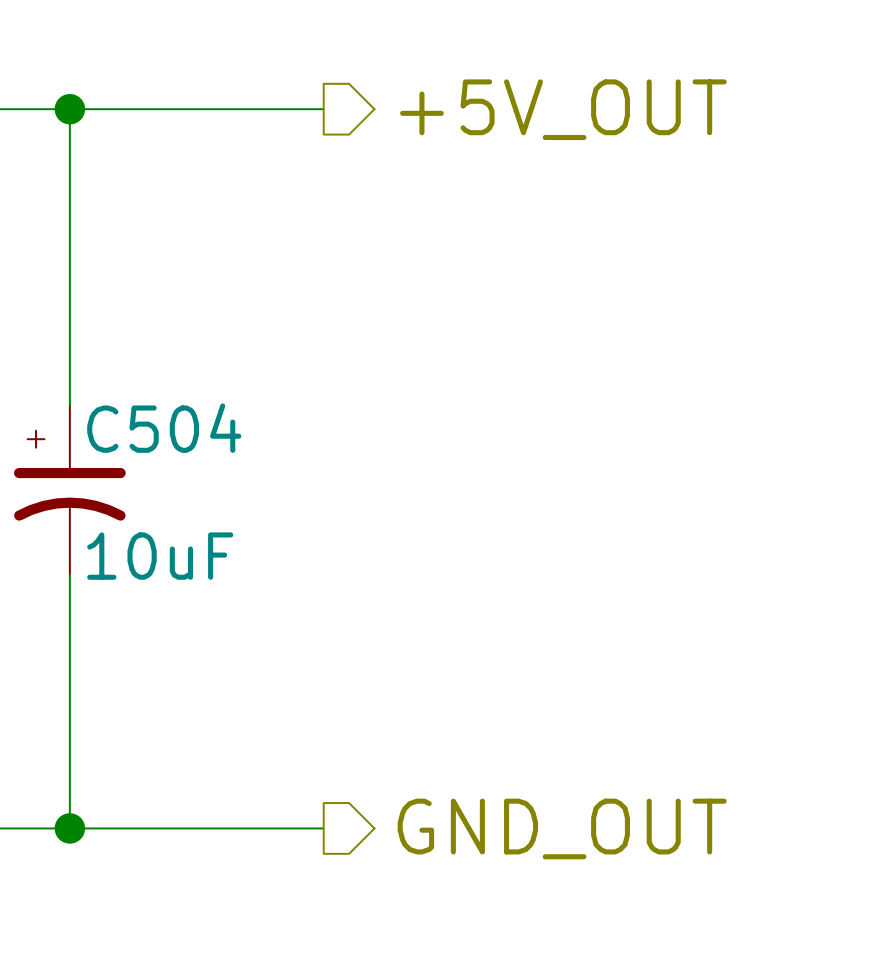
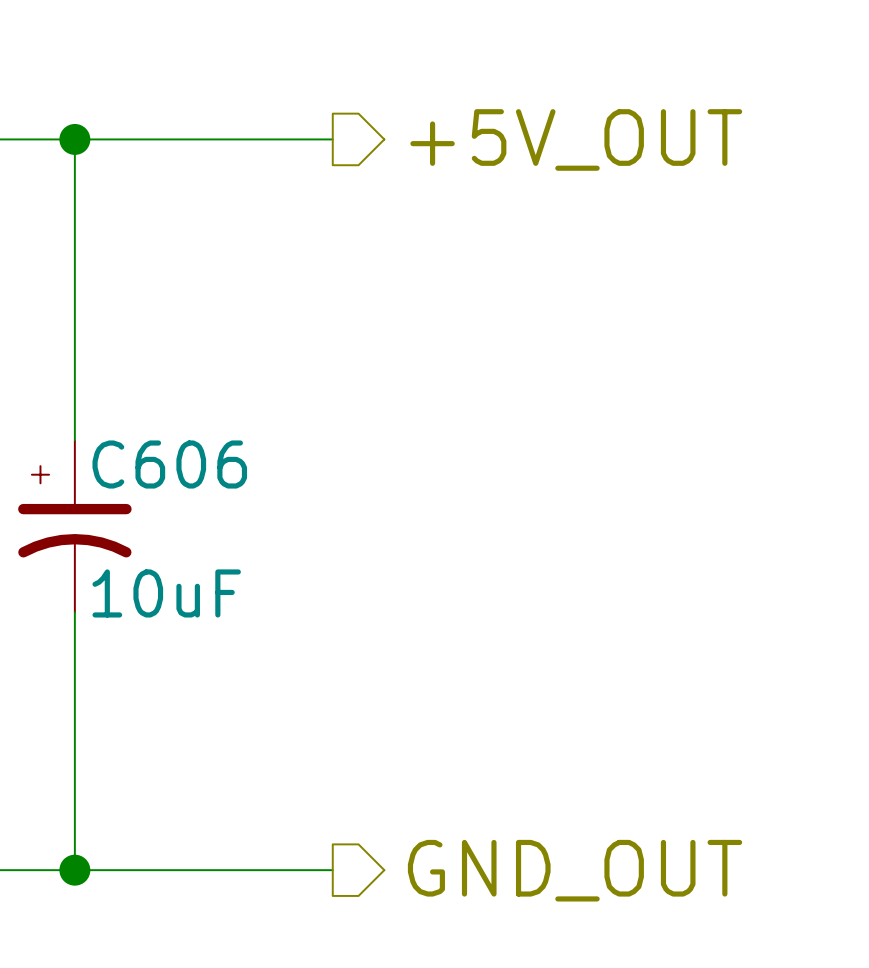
C504 name: C504 (164, 428) -> C606 (169, 464)

